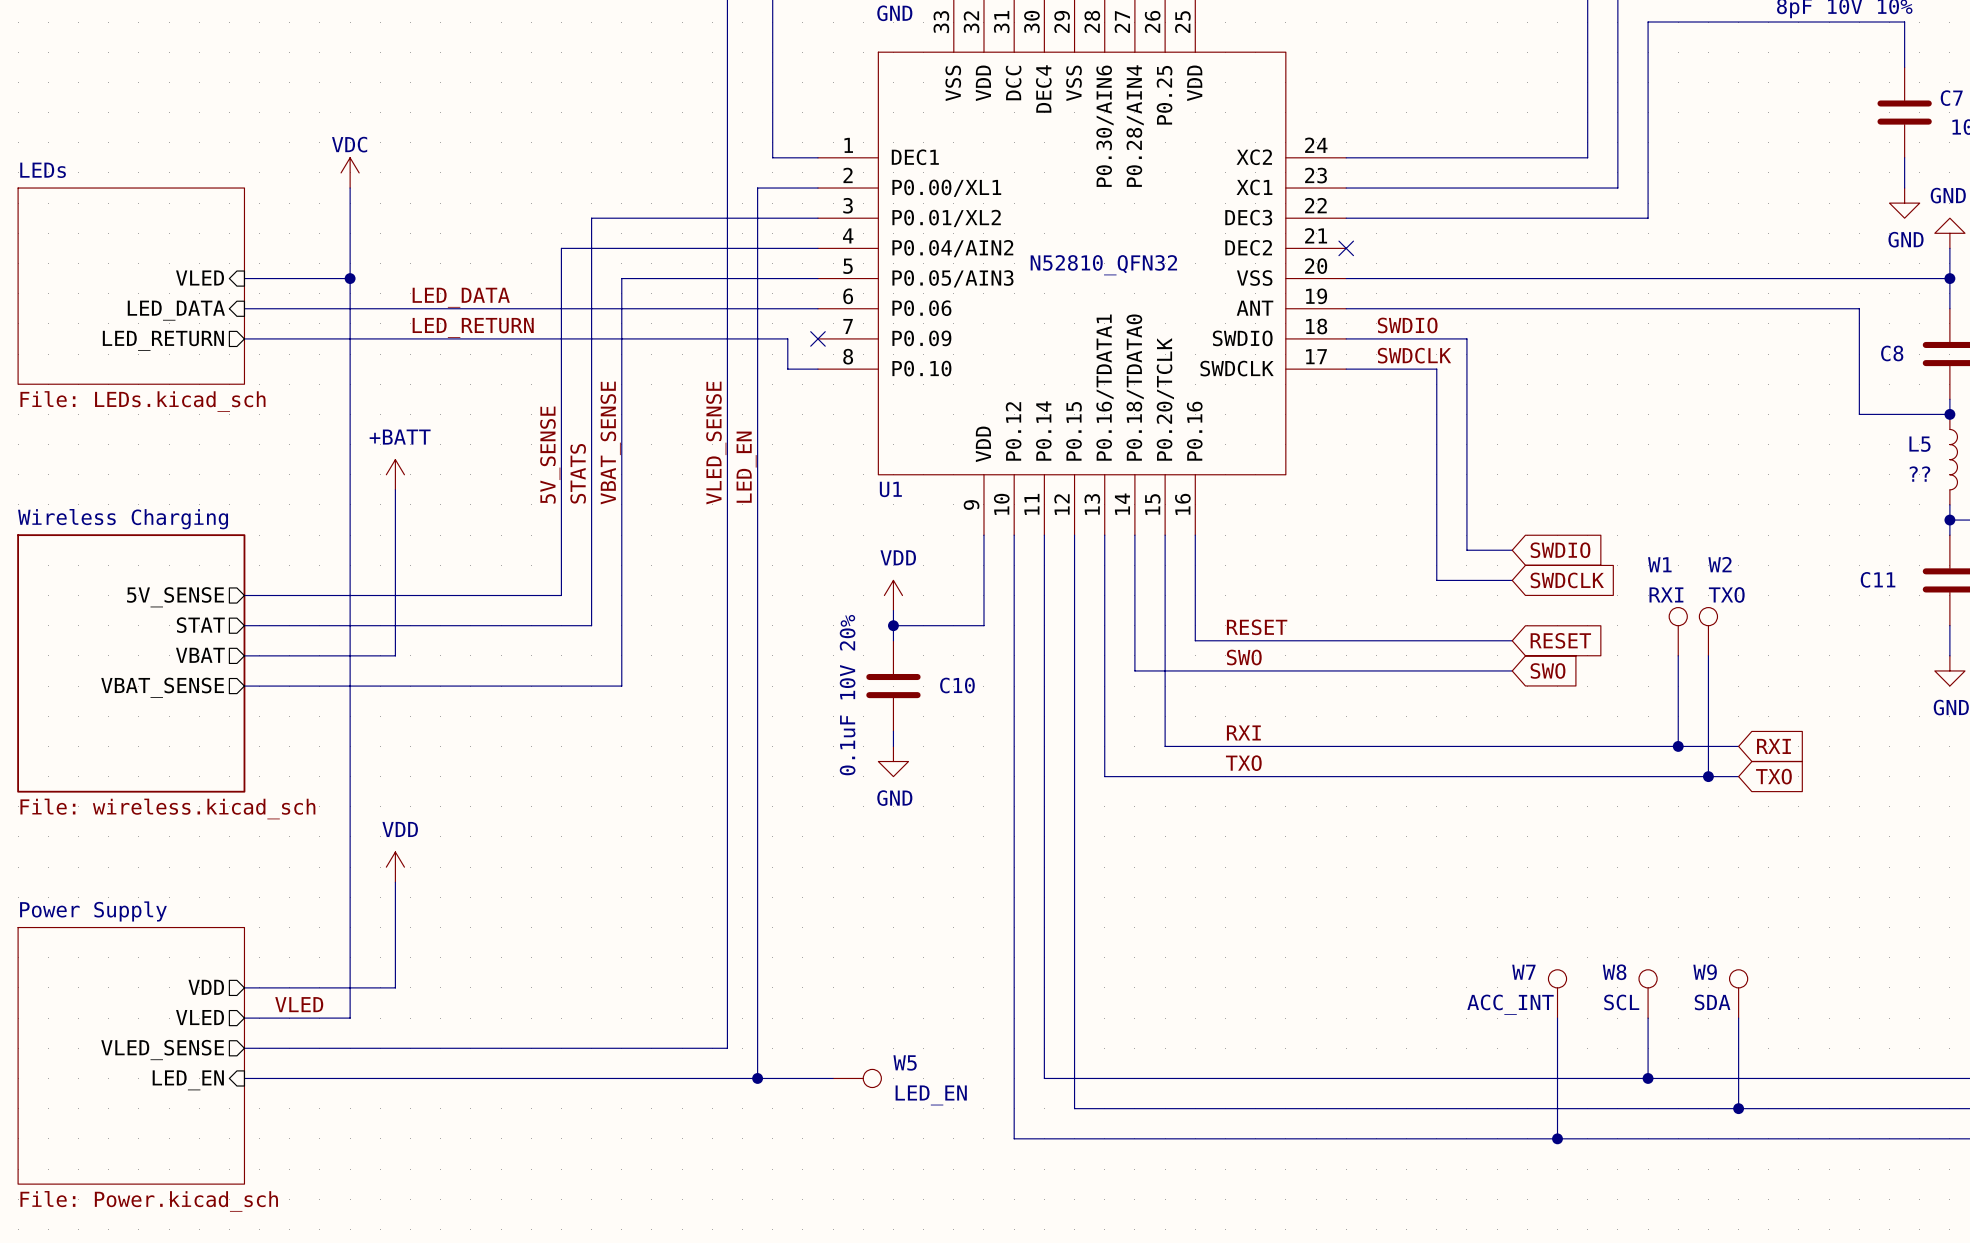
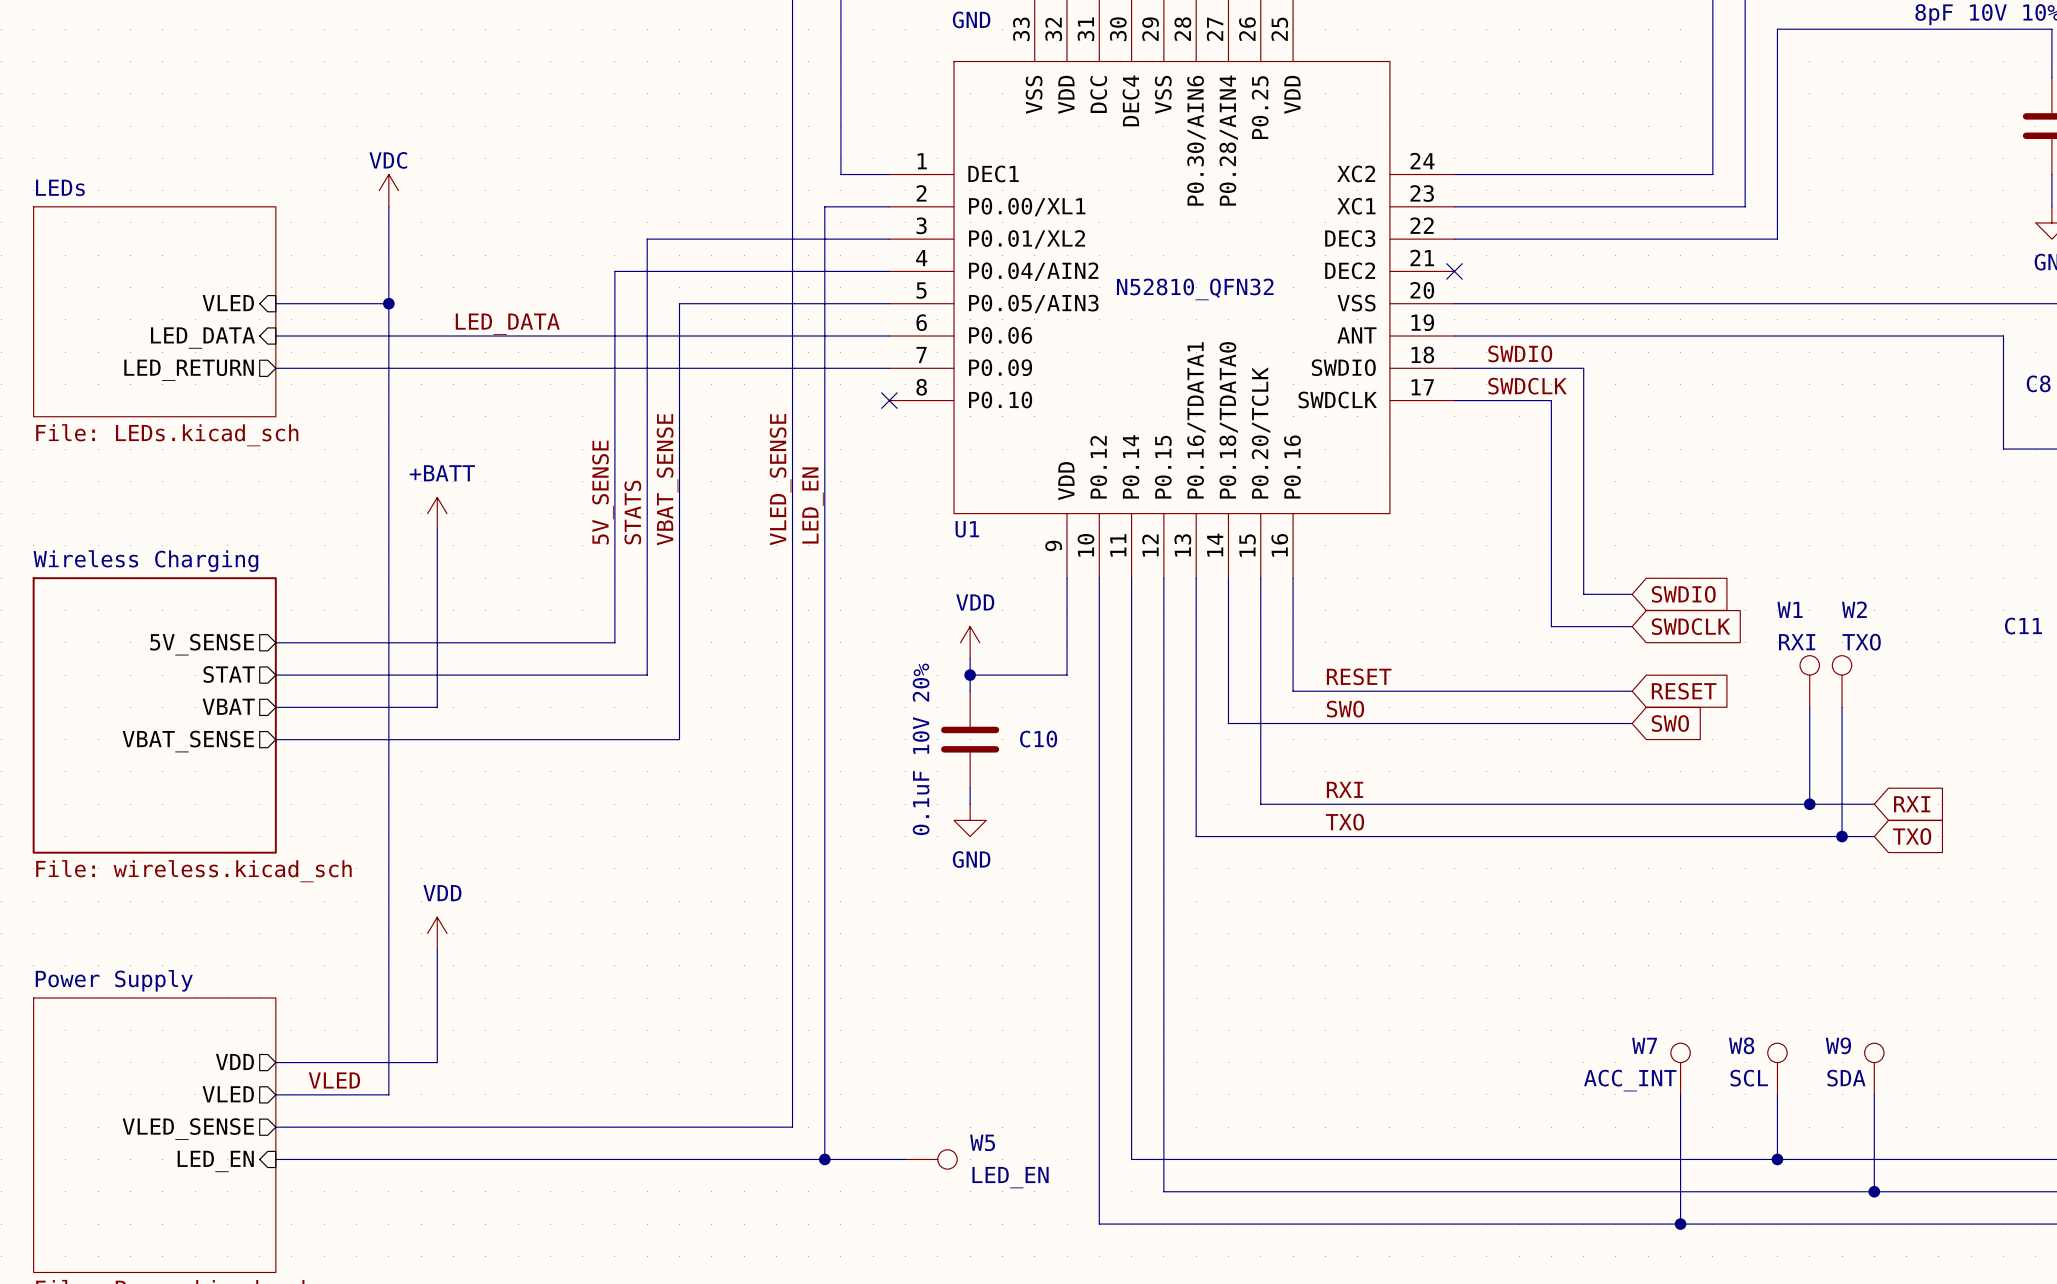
label: LED_RETURN (473, 327) -> none
wire: (787, 338) (787, 369) (817, 369) -> (857, 368) (889, 368)
no-connect mark position: (817, 338) -> (889, 400)

